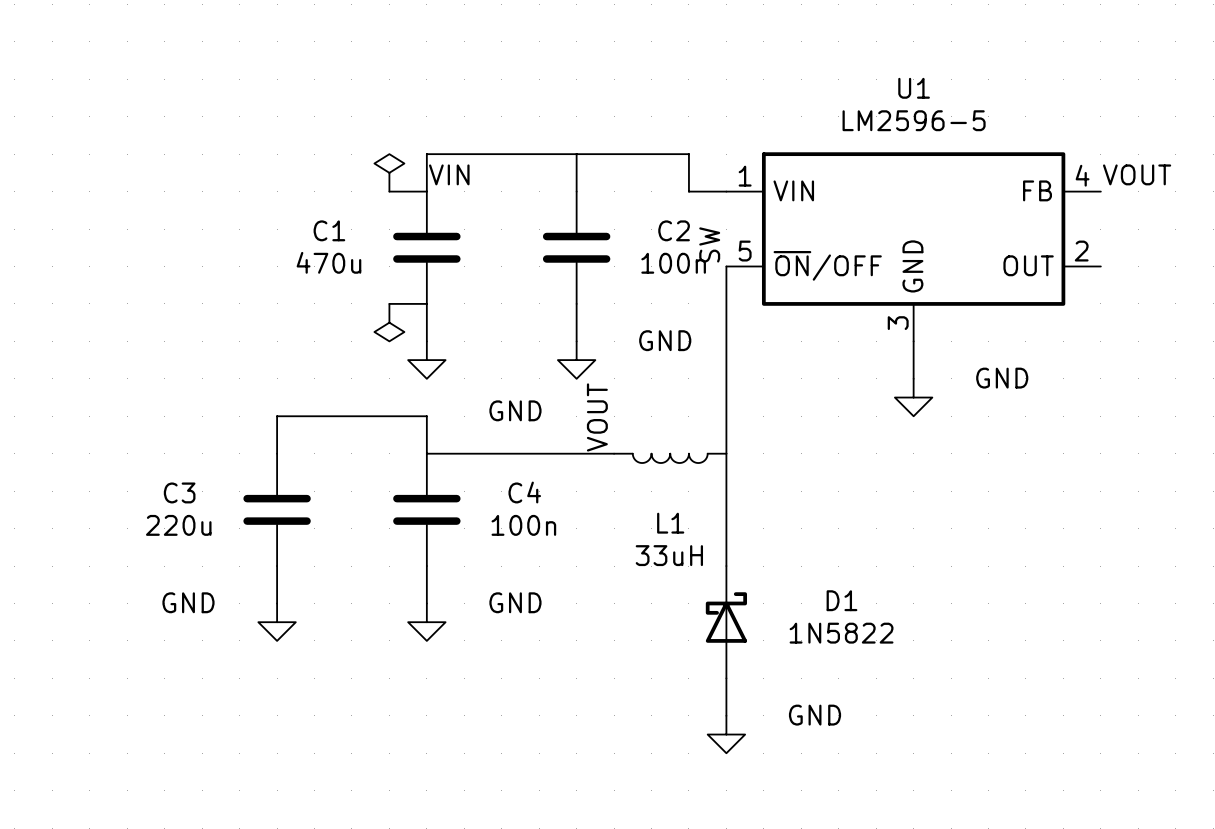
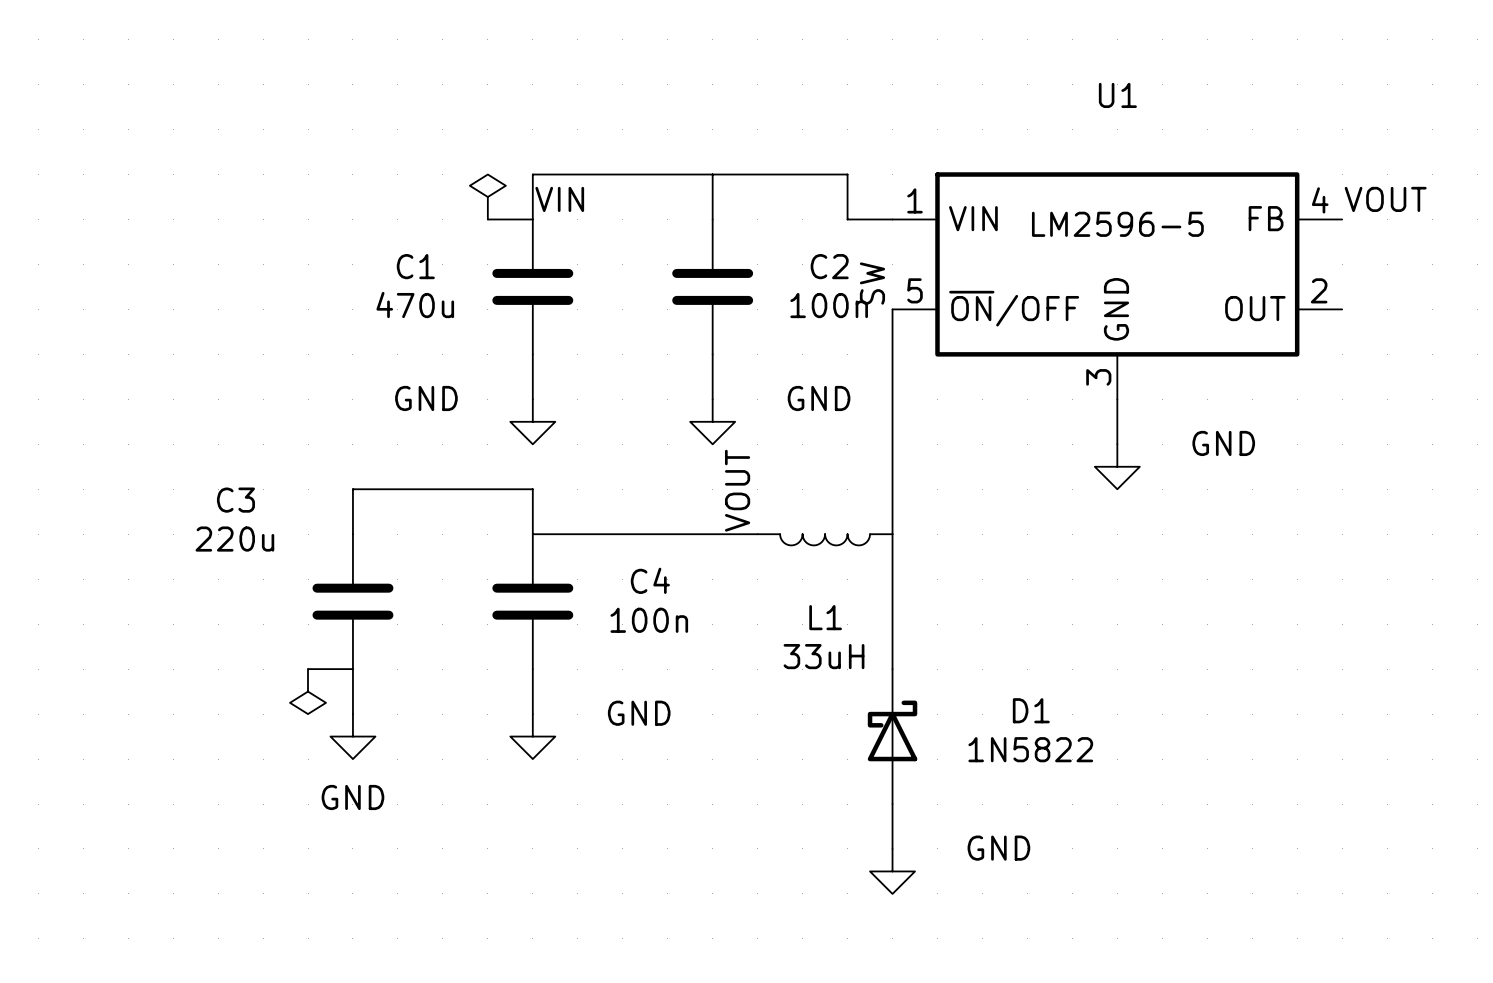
U1 value position: LM2596-5 (914, 120) -> LM2596-5 (1117, 224)
wire: (389, 303) (426, 303) -> (308, 669) (352, 669)
power symbol position: (389, 322) -> (308, 691)
power symbol text position: GND (515, 410) -> GND (426, 398)
C3 name position: C3 (179, 492) -> C3 (235, 500)
C3 value position: 220u (178, 525) -> 220u (234, 539)
power symbol text position: GND (188, 602) -> GND (352, 797)

